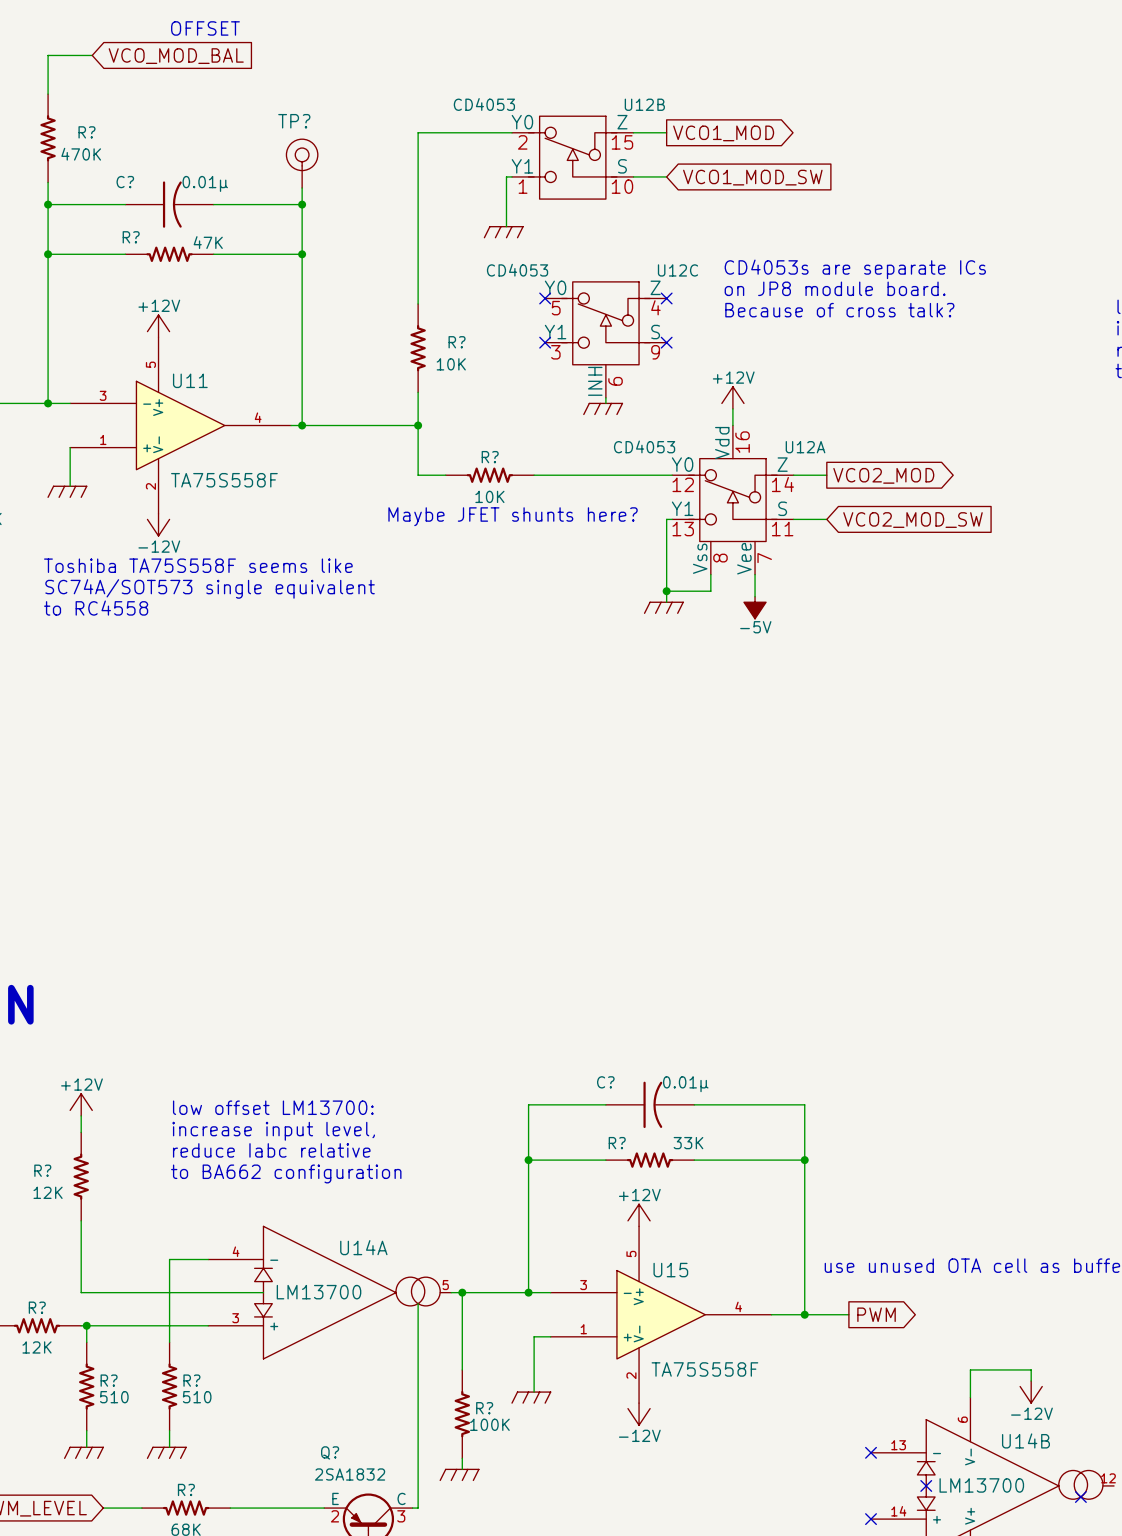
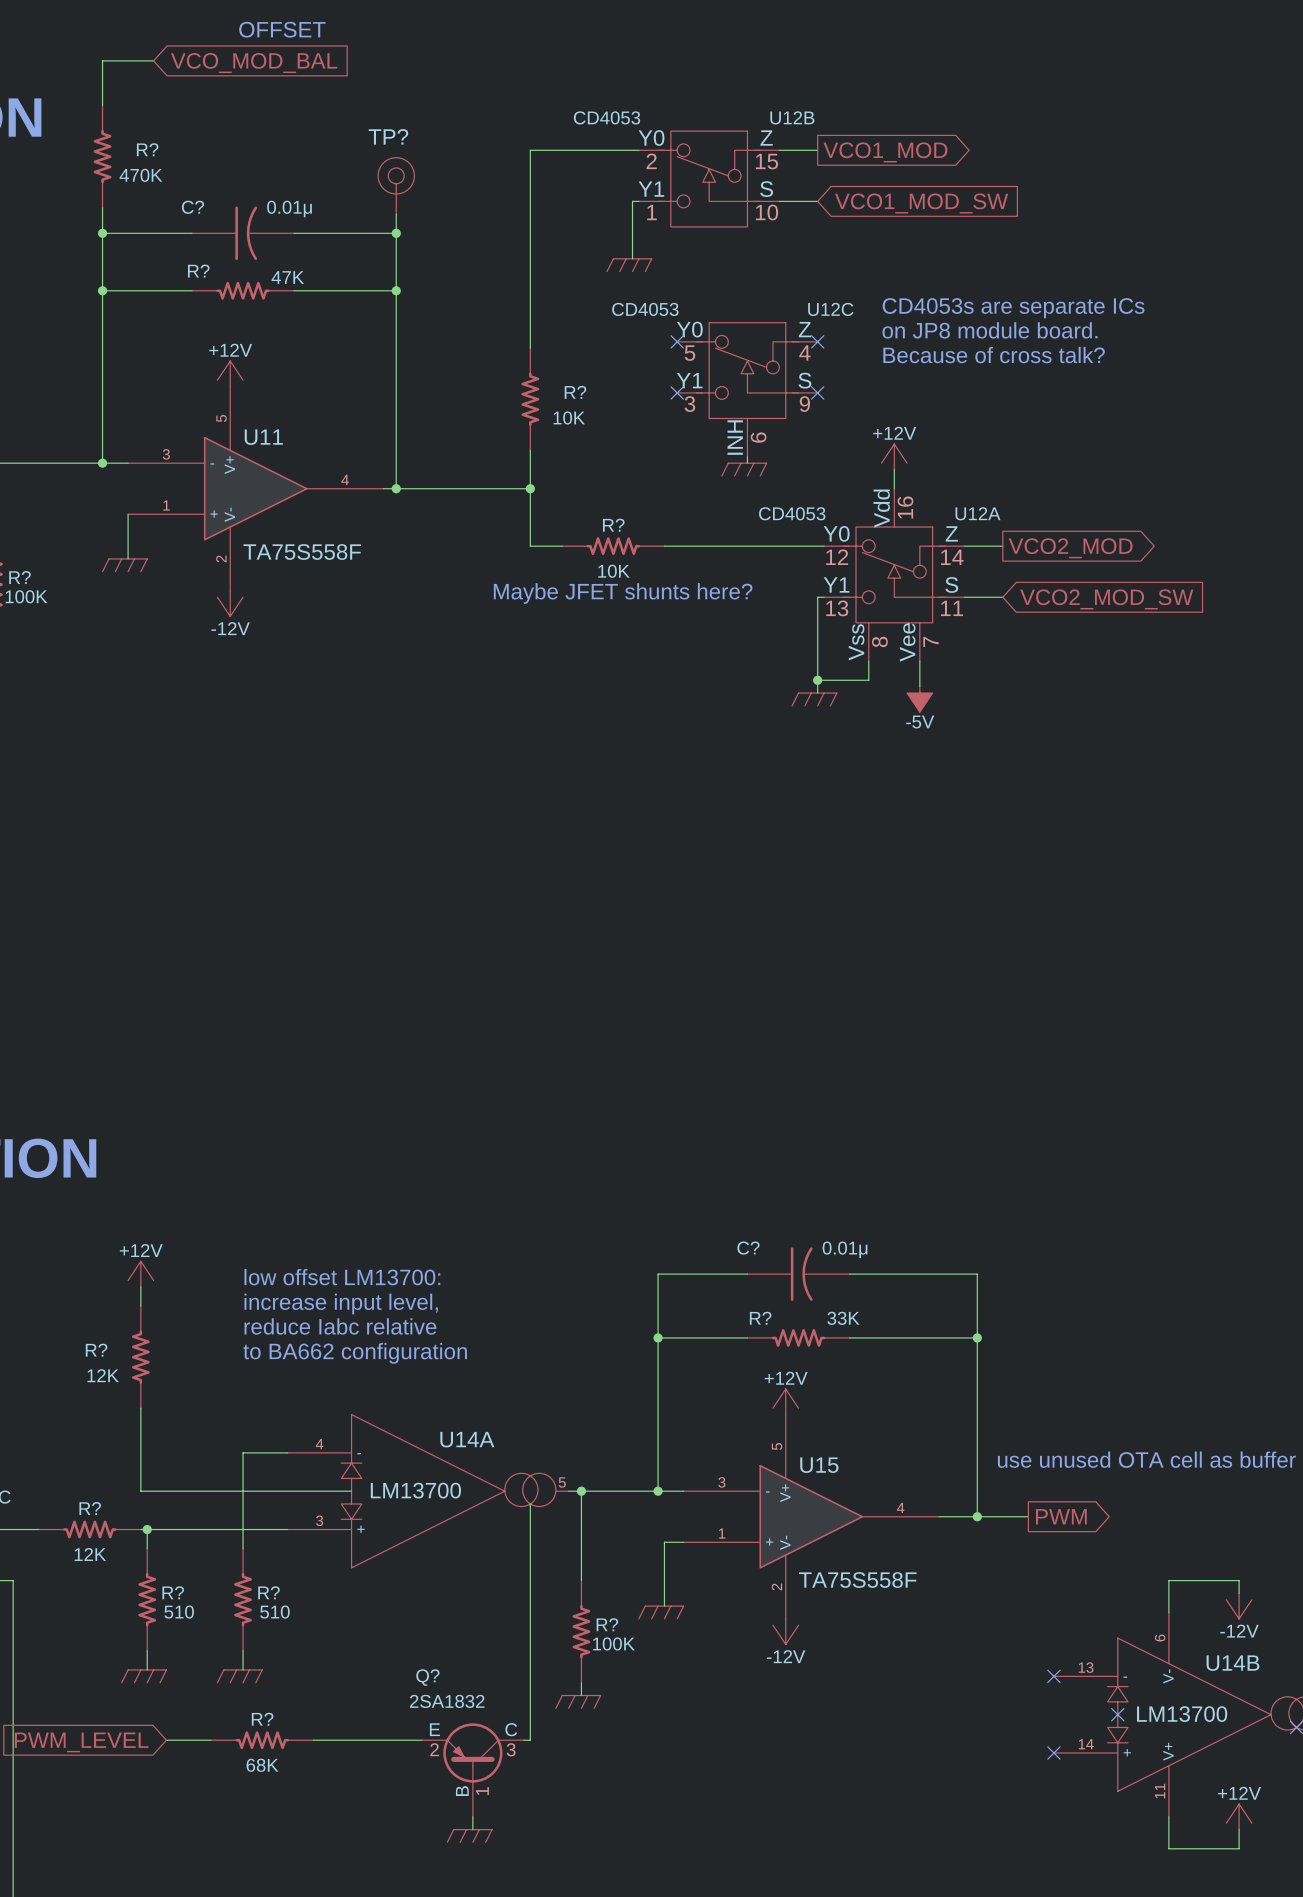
text: Toshiba TA75S558F seems like (198, 565) -> none
text: SC74A/SOT573 single equivalent (210, 588) -> none
text: to RC4558 (96, 608) -> none

